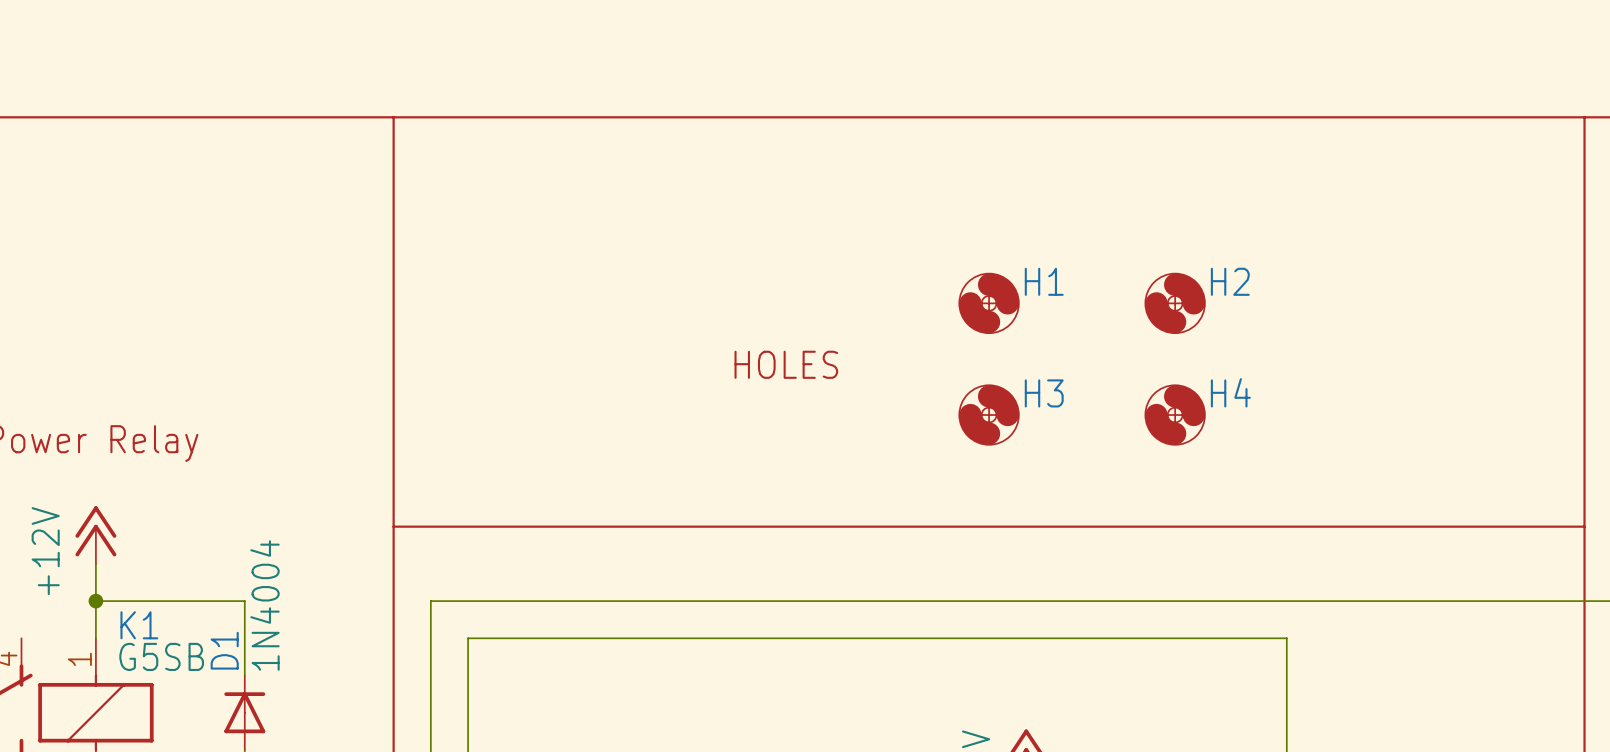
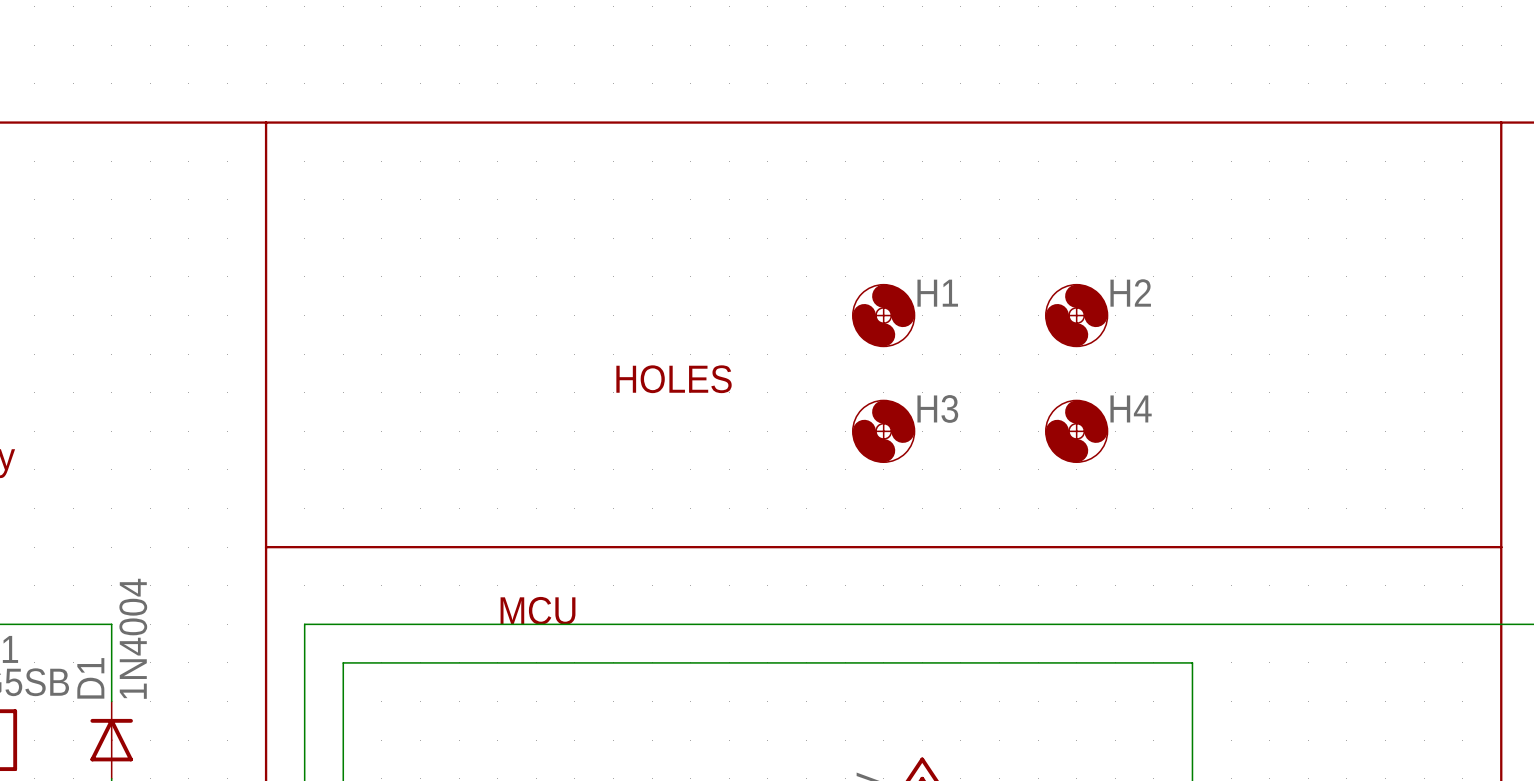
text: none -> MCU (538, 610)

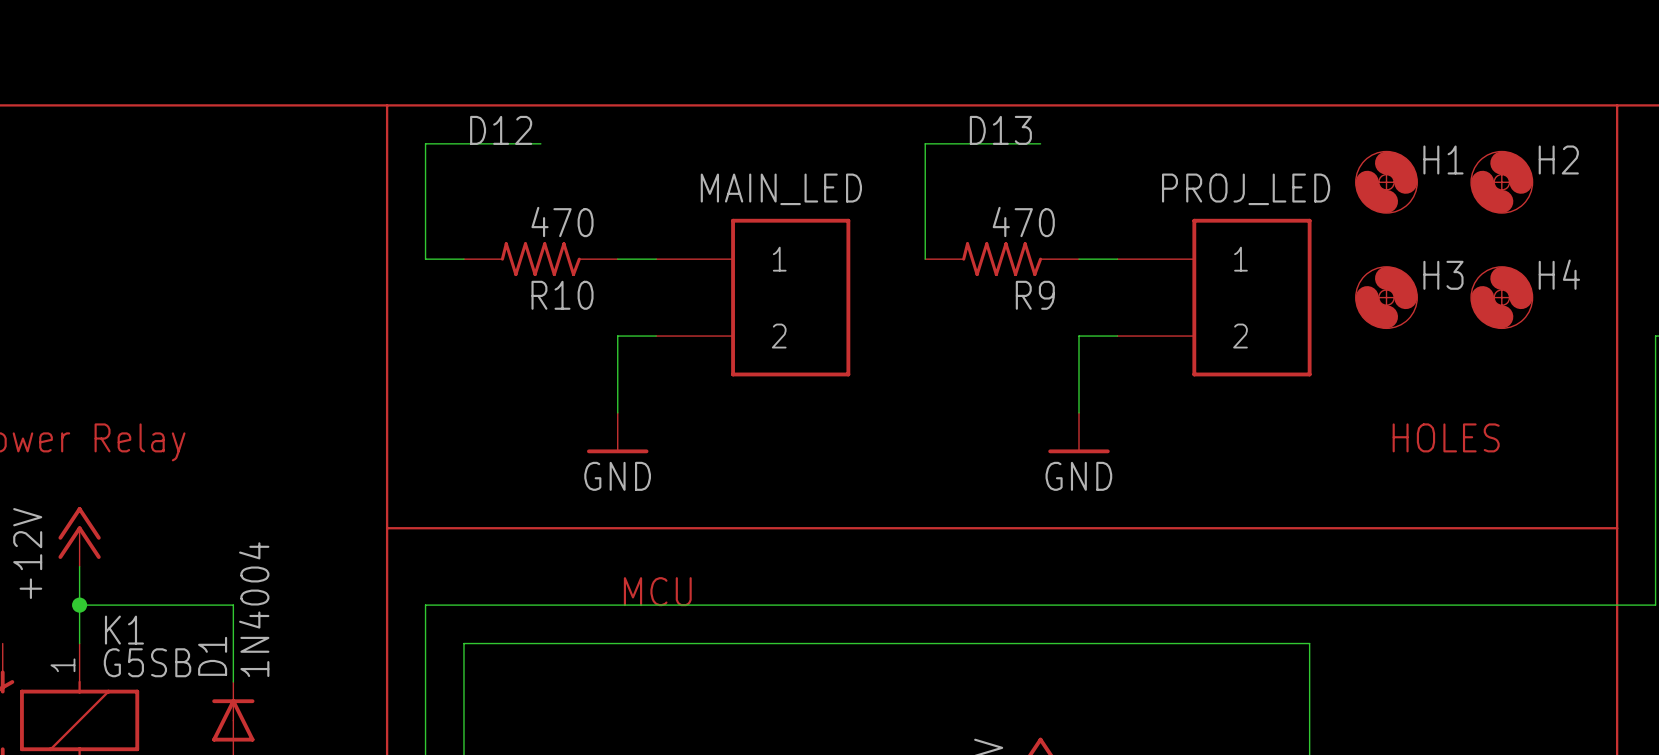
label: none -> D12 (501, 130)
label: none -> D13 (1000, 130)
wire: none -> (540, 143) (425, 143) (425, 259) (463, 259)
wire: none -> (1040, 143) (925, 143) (925, 259)
R10: none -> 470 (540, 259)
wire: none -> (617, 259) (656, 259)
R9: none -> 470 (1002, 259)
wire: none -> (1079, 259) (1117, 259)
MAIN_LED: none -> (753, 297)
H1 position: (883, 315) -> (1386, 182)
H2 position: (1076, 315) -> (1501, 182)
PROJ_LED: none -> (1214, 297)
wire: none -> (656, 336) (617, 336) (617, 412)
wire: none -> (1117, 336) (1079, 336) (1079, 412)
text: HOLES (674, 379) -> none
H3 position: (883, 431) -> (1386, 297)
H4 position: (1076, 431) -> (1501, 297)
power symbol: none -> GND (617, 433)
power symbol: none -> GND (1079, 433)
text: none -> HOLES (1446, 437)

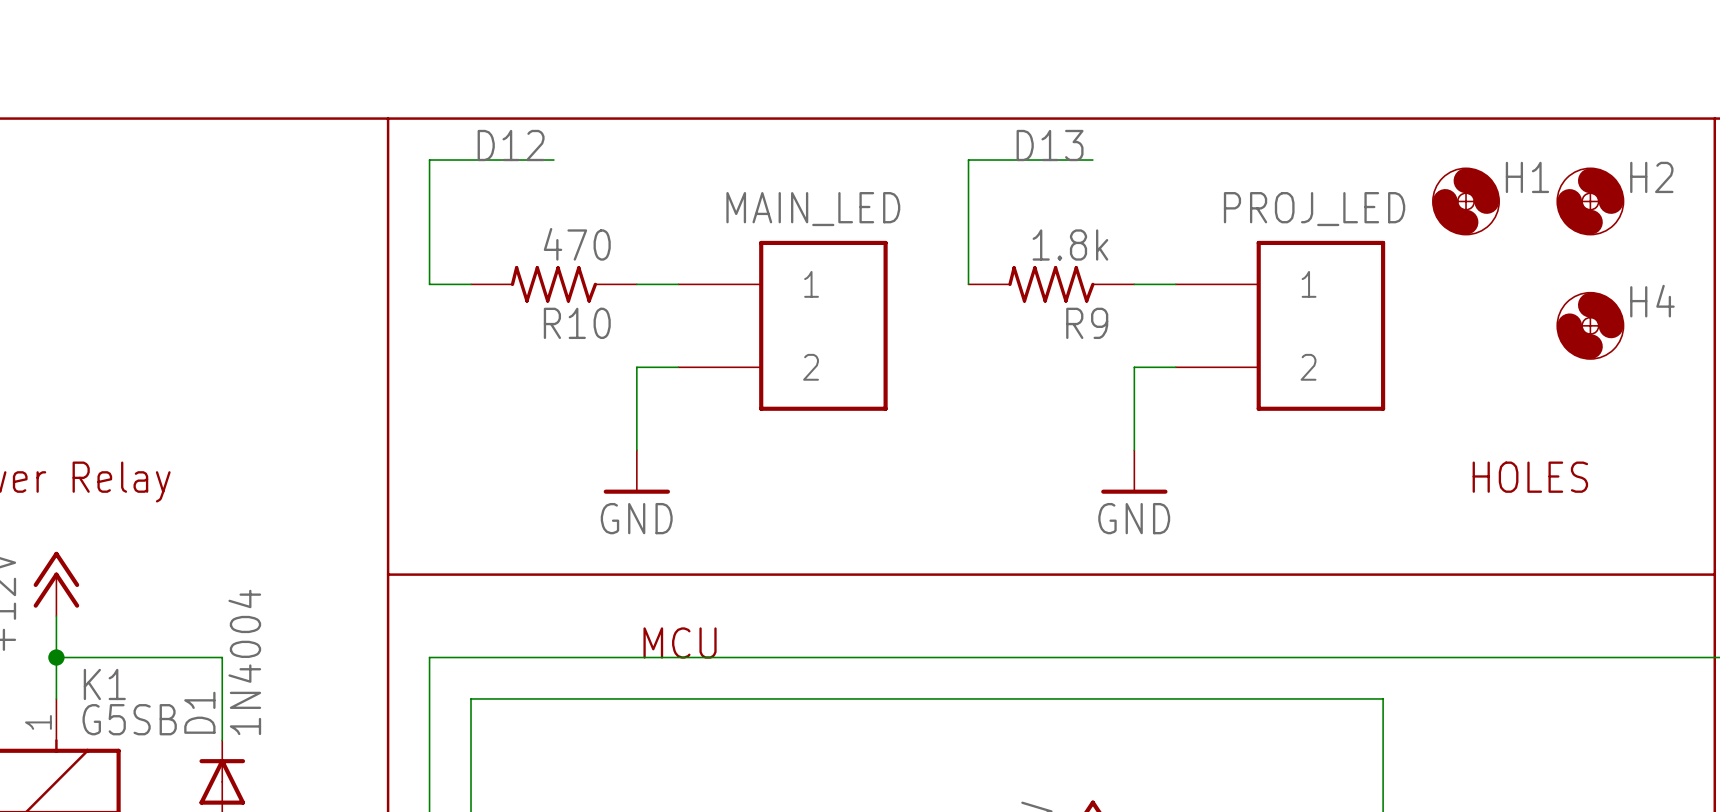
R9 value: 470 (1023, 222) -> 1.8k (1070, 245)
H3: (1386, 297) -> none

